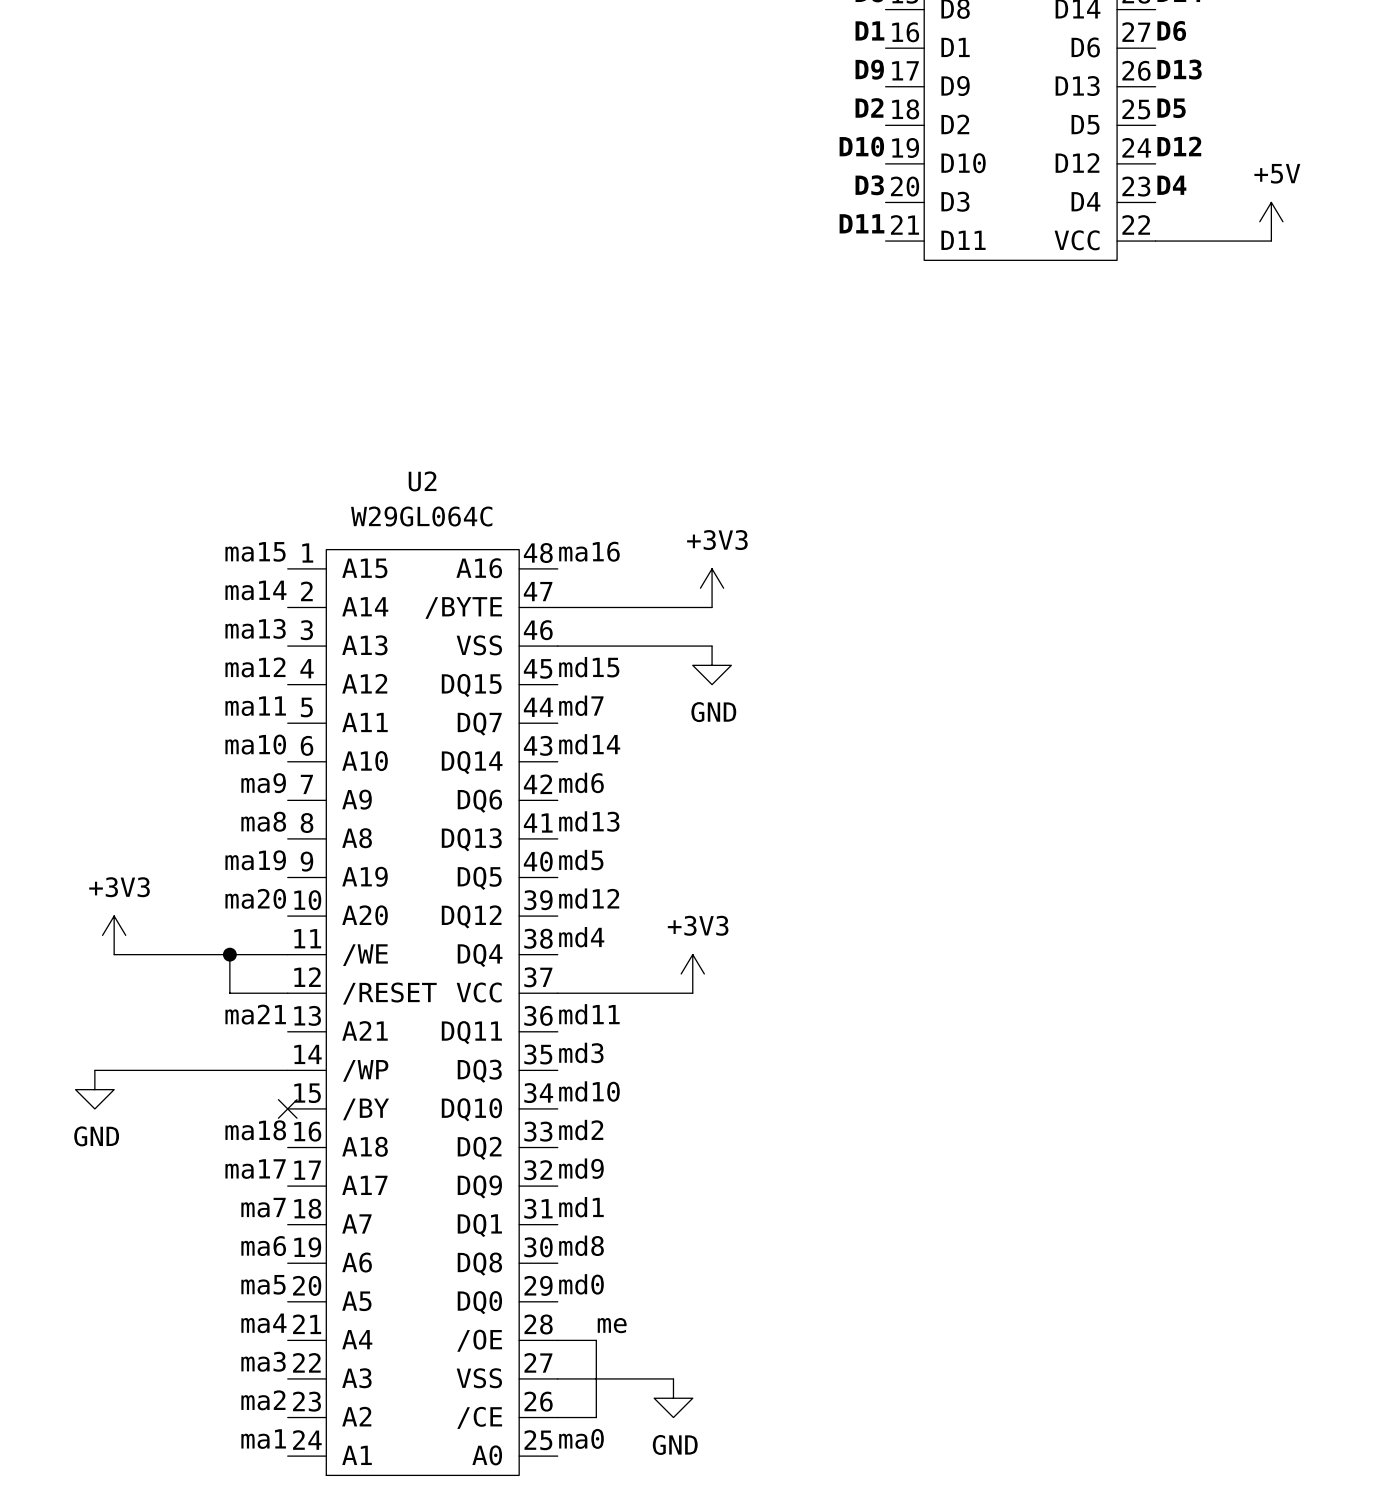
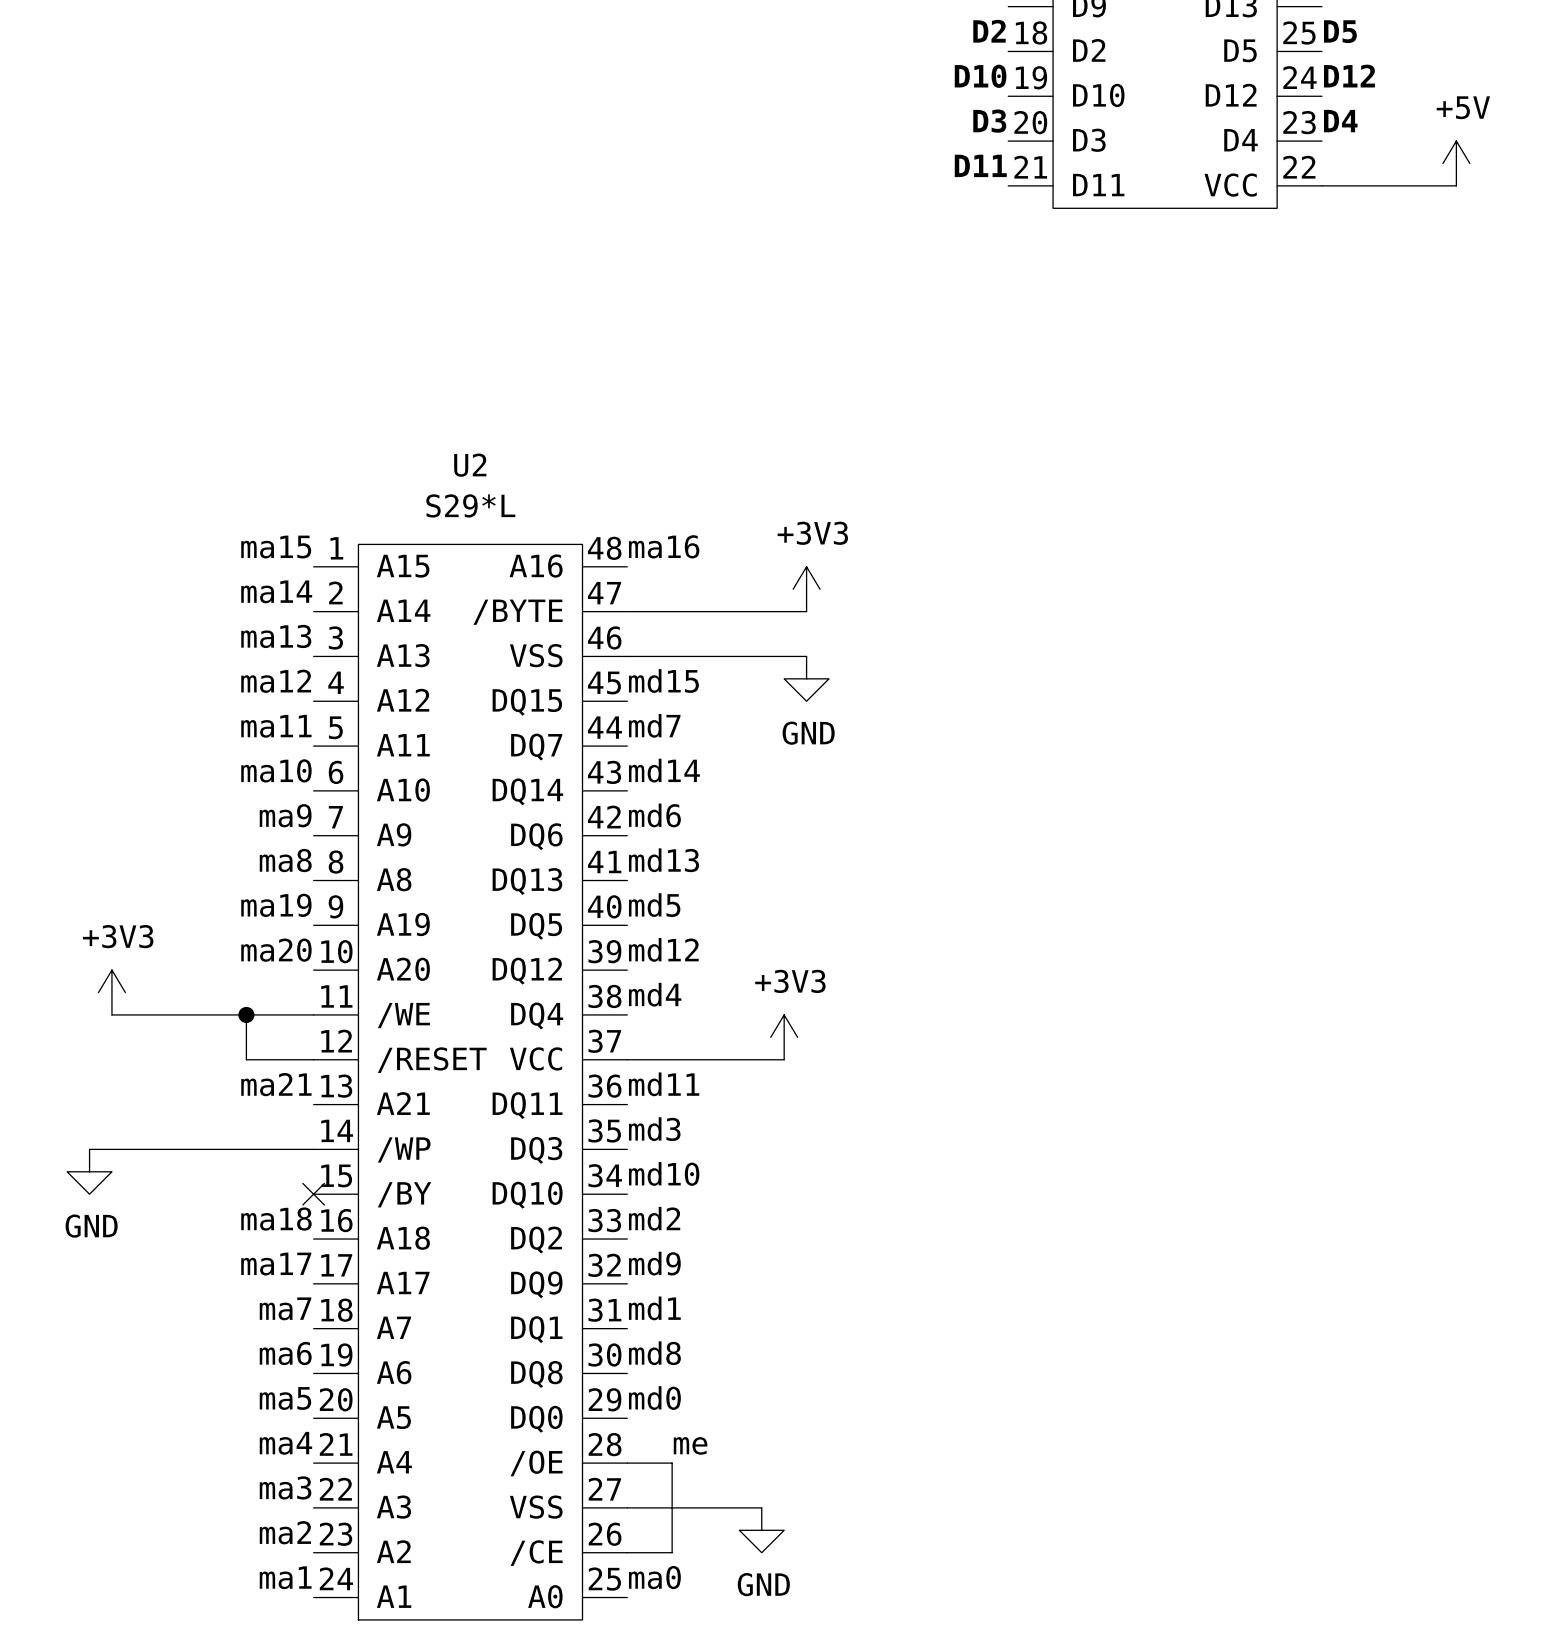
U2 value: W29GL064C (421, 516) -> S29*L (470, 505)

